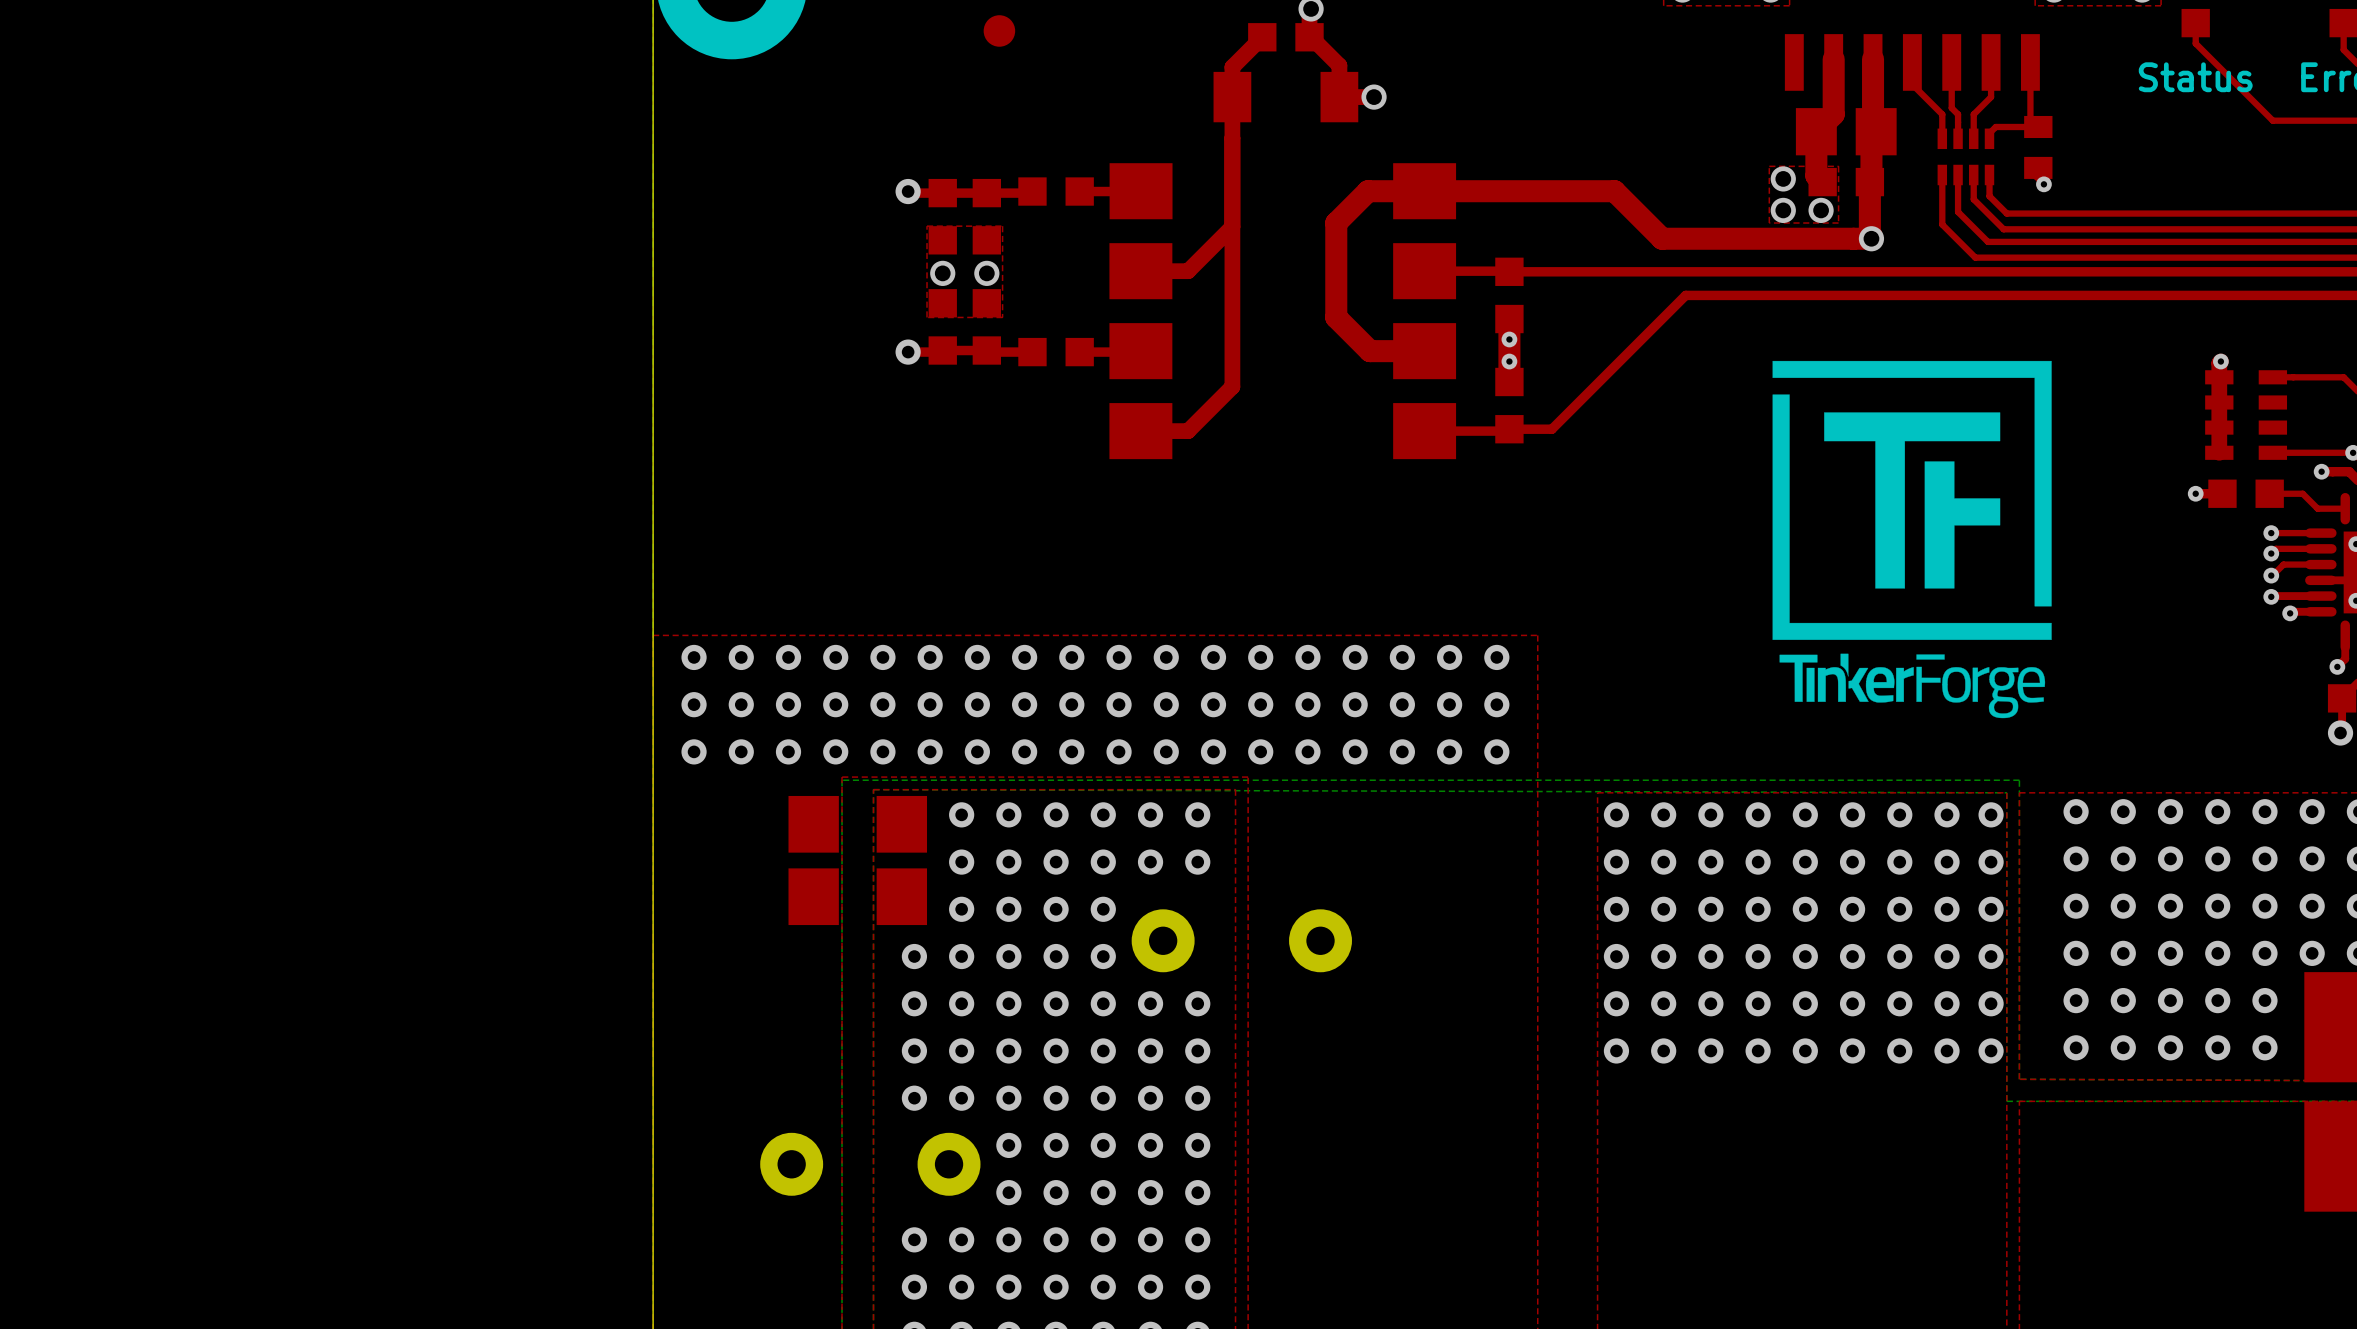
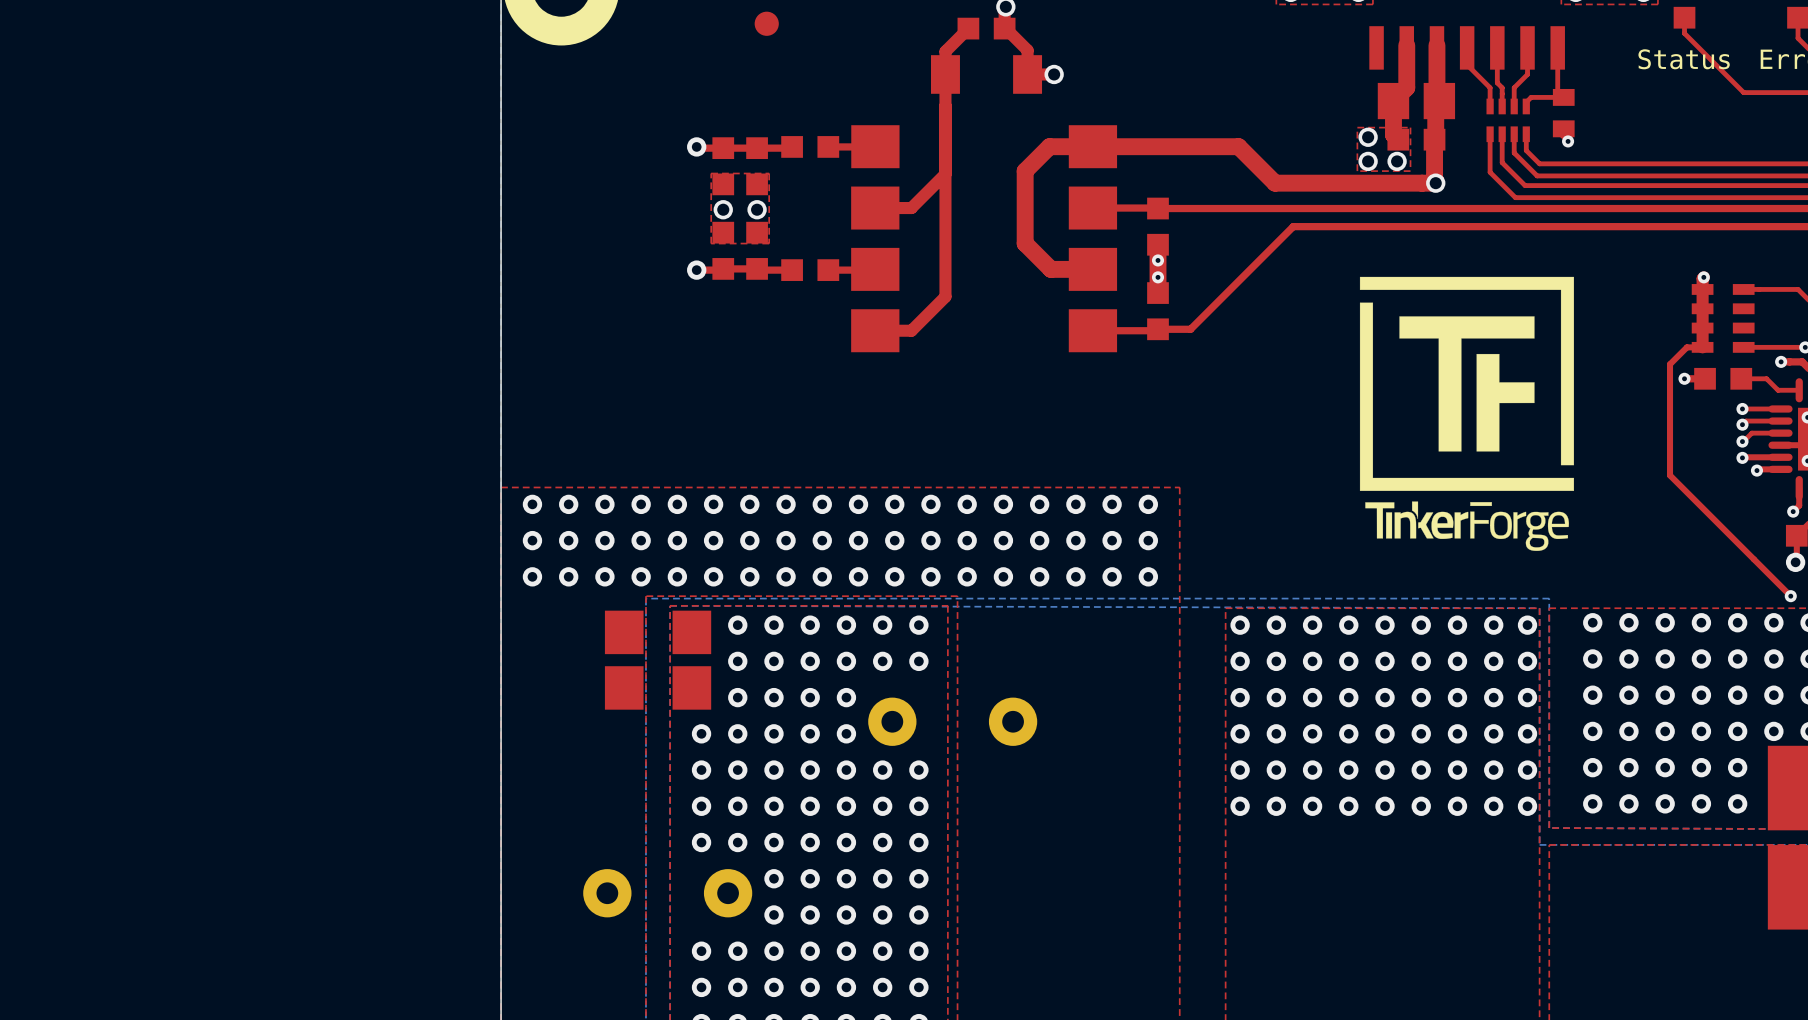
top track: none -> (1702, 347) (1686, 347) (1670, 364) (1670, 475) (1790, 596)
via: none -> (1790, 596)

